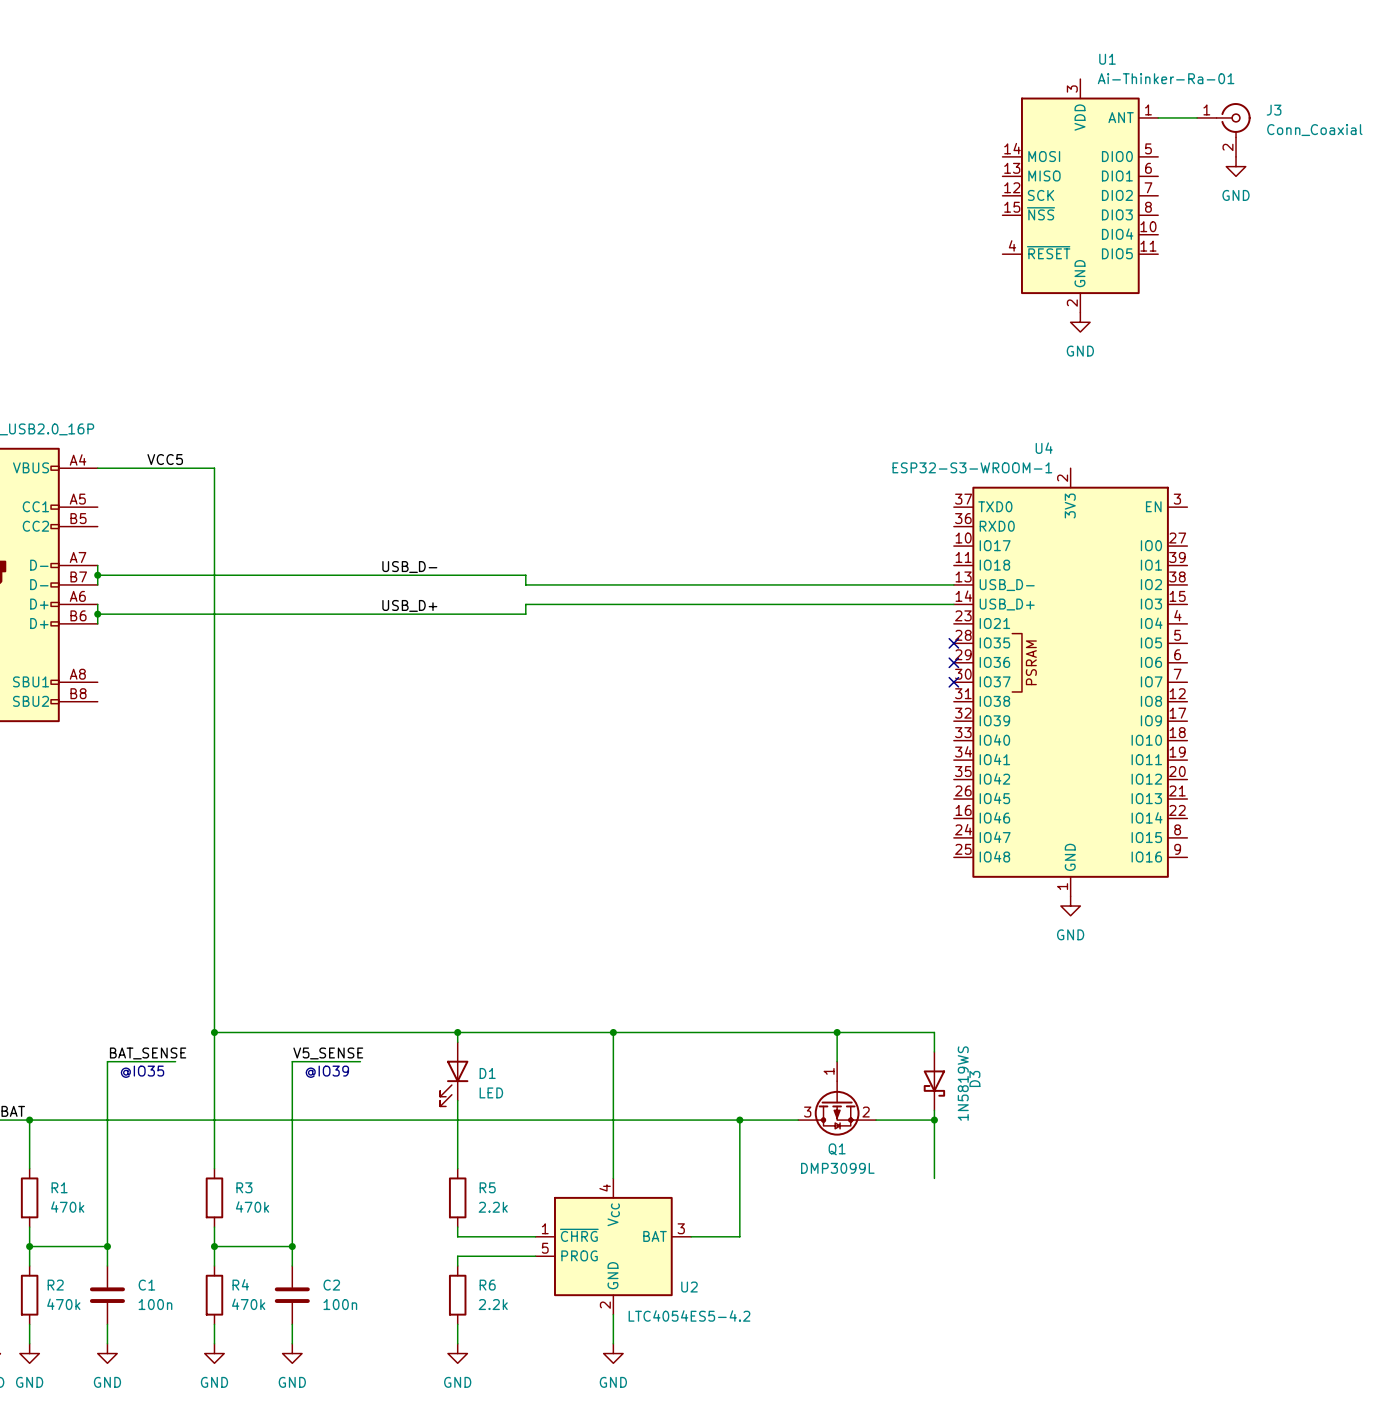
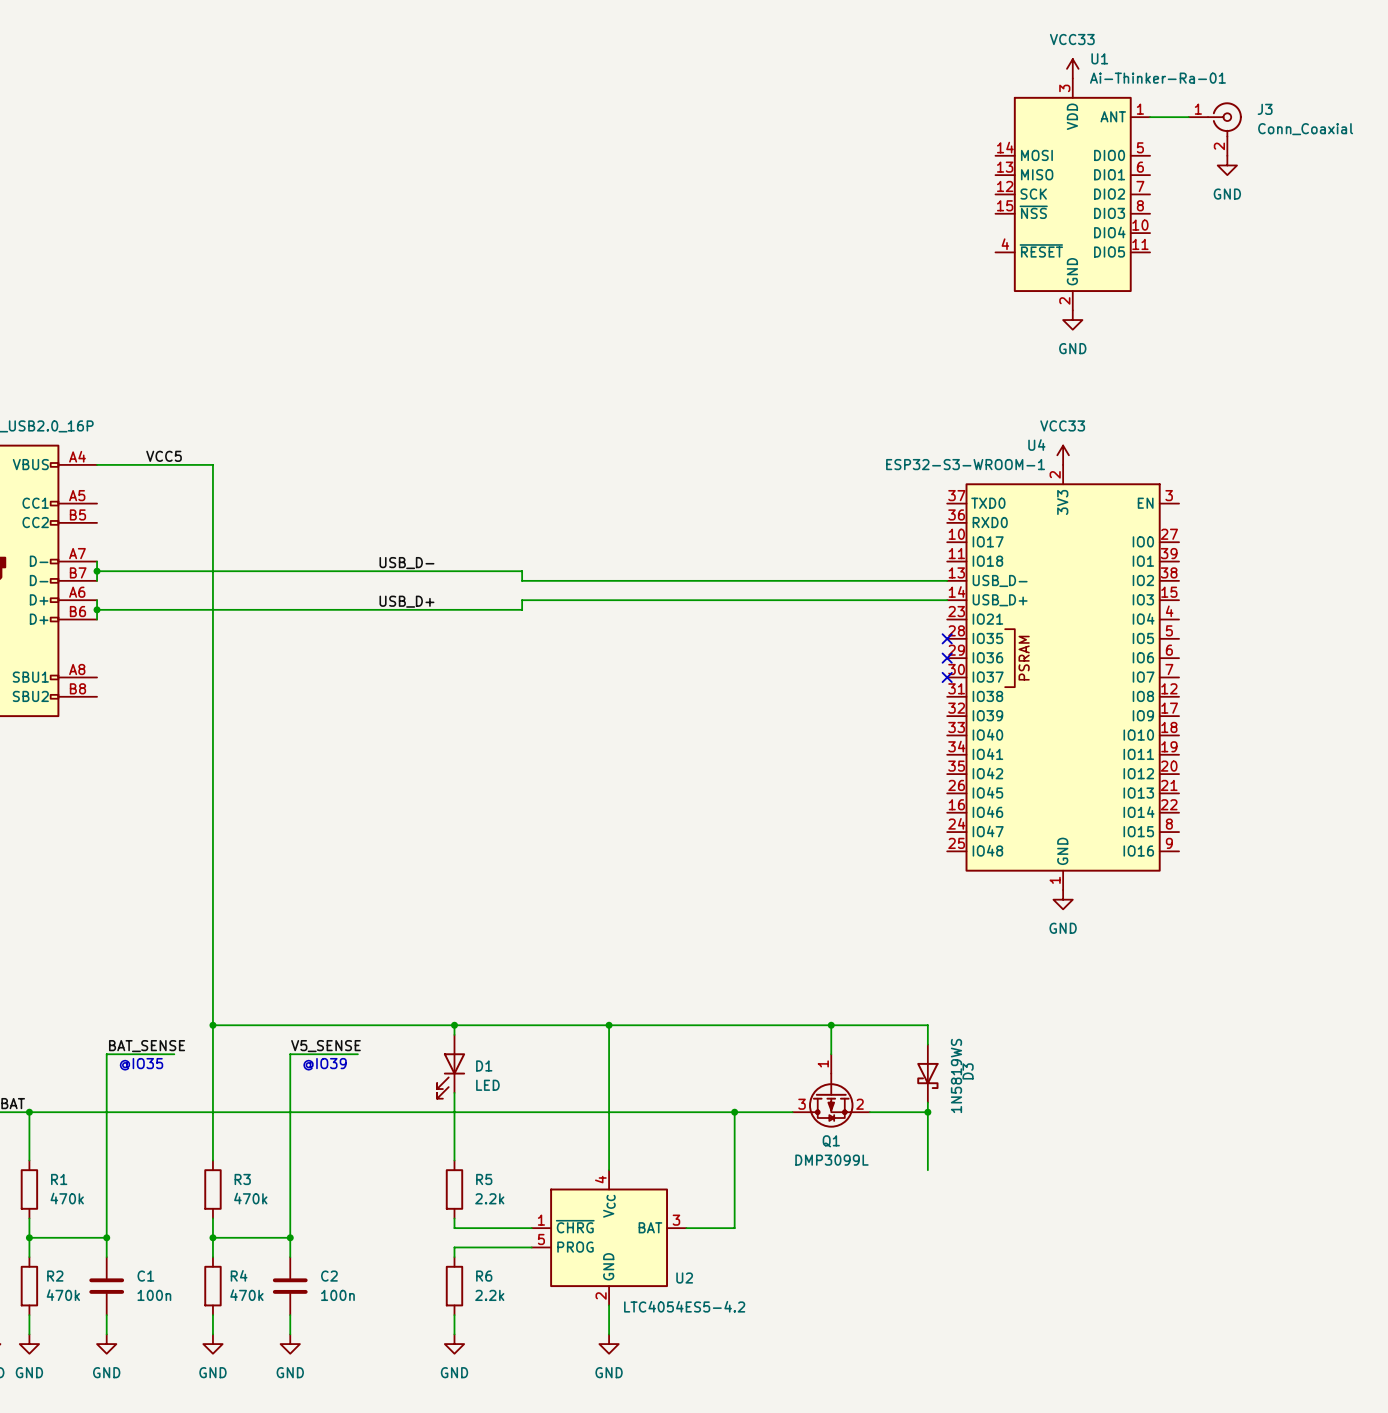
power symbol: none -> VCC33 (1072, 68)
power symbol: none -> VCC33 (1063, 455)

